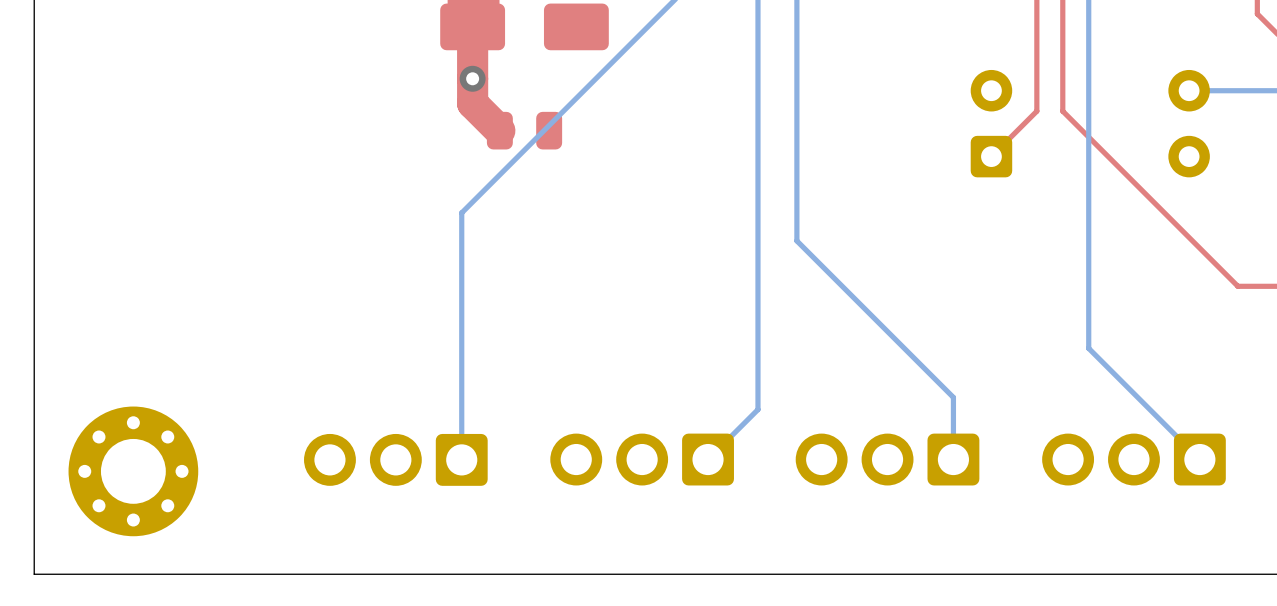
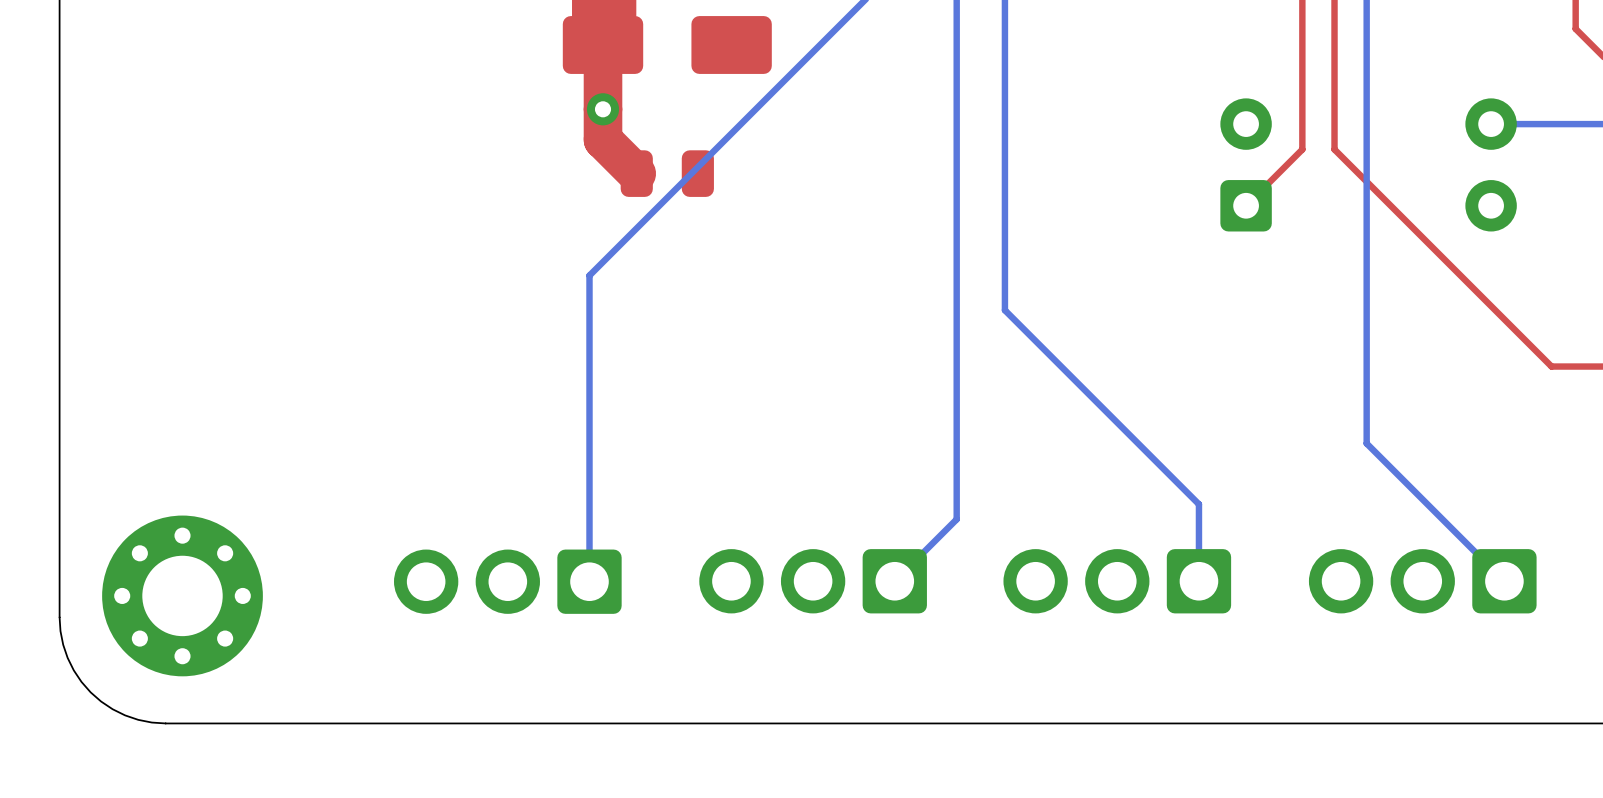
board edge: (34, 488) (34, 574) (119, 574) -> (59, 617) (63, 644) (67, 657) (73, 670) (90, 692) (112, 709) (125, 715) (138, 719) (165, 723)

